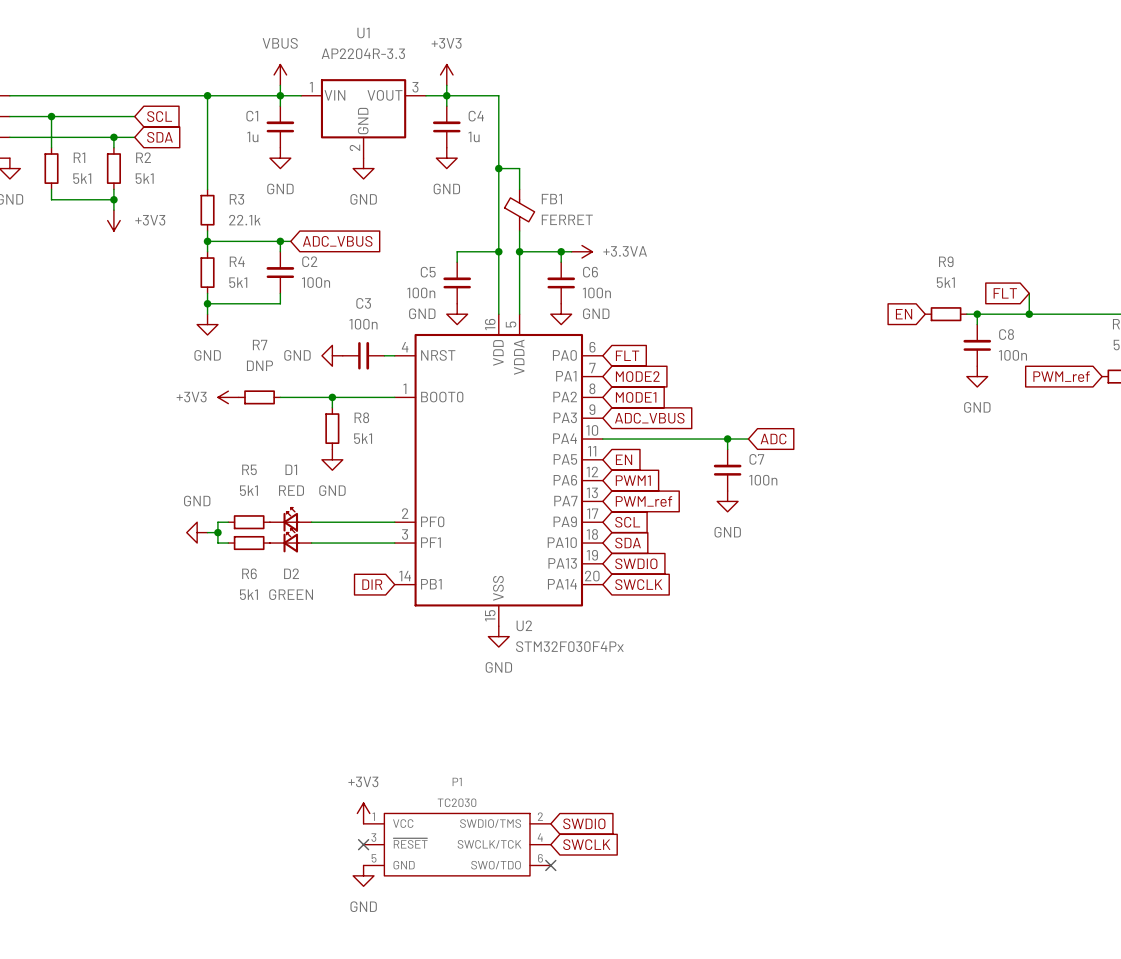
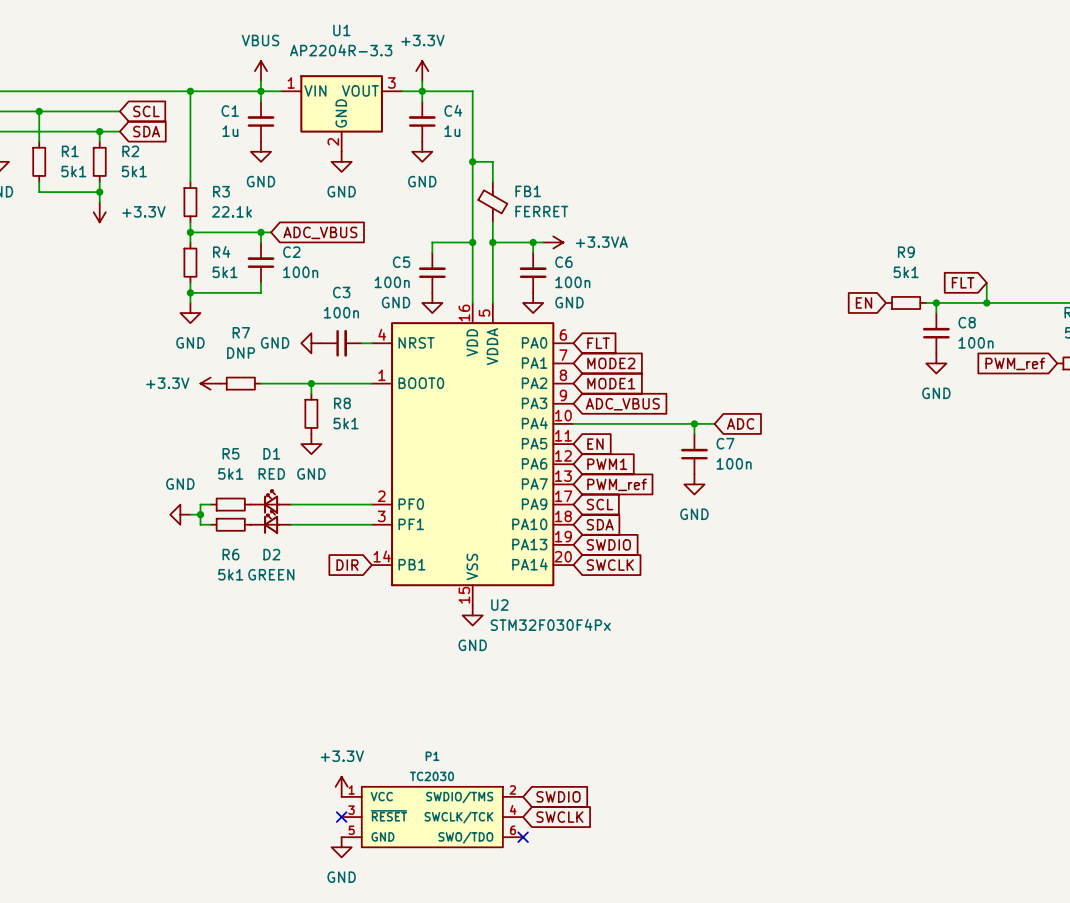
power symbol: +3V3 (446, 74) -> +3.3V (422, 71)
power symbol: +3V3 (113, 220) -> +3.3V (99, 212)
power symbol: +3V3 (228, 397) -> +3.3V (210, 383)
power symbol: +3V3 (363, 813) -> +3.3V (341, 786)

